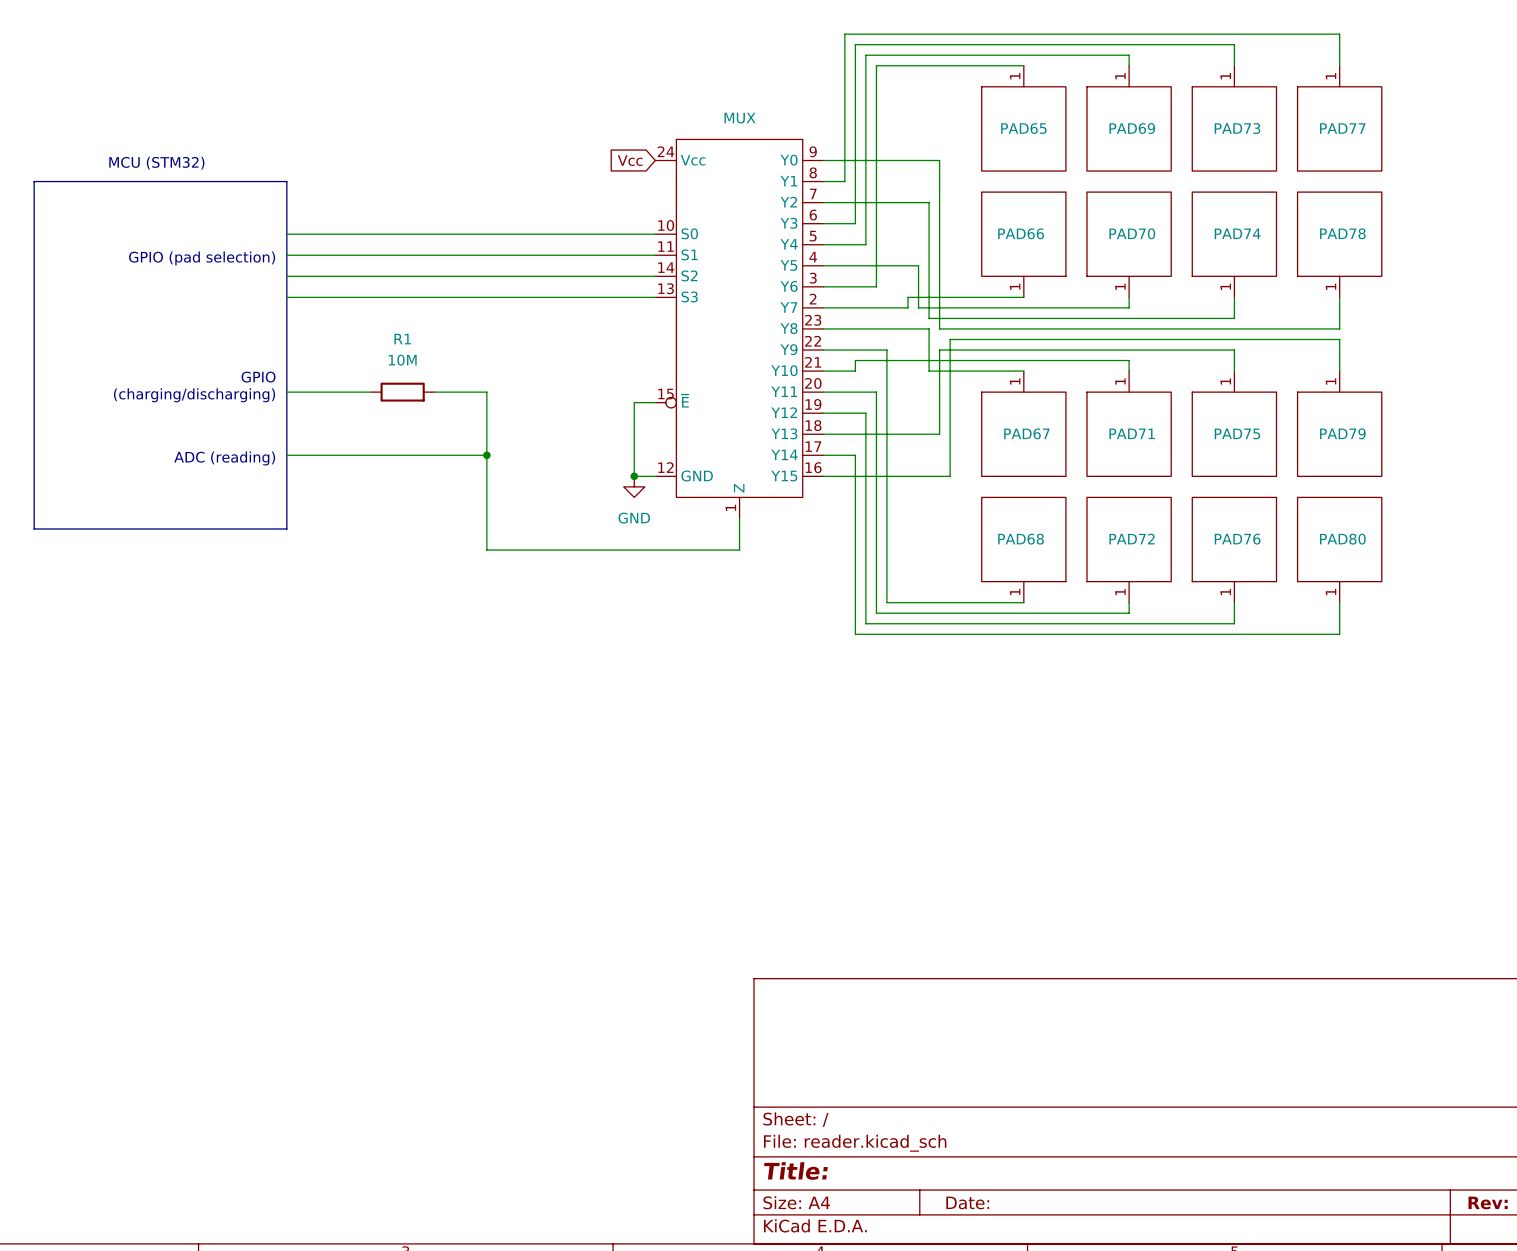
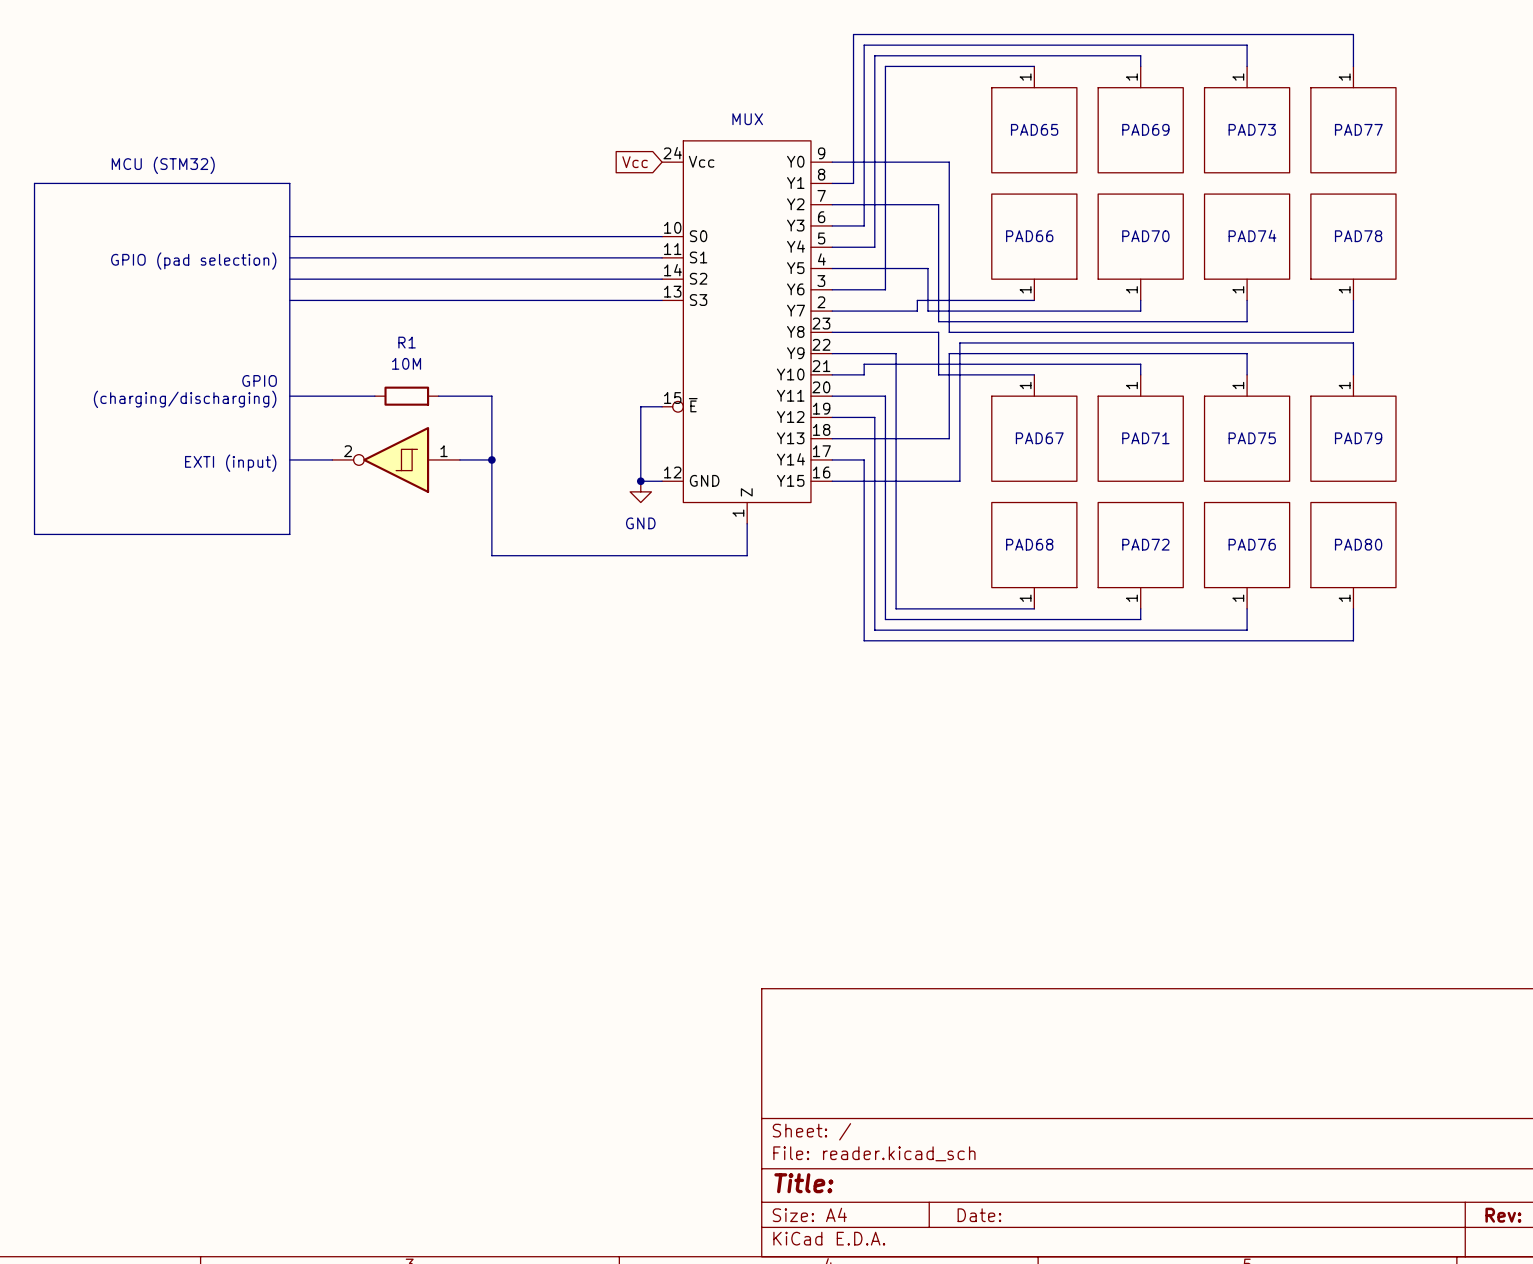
part: none -> (396, 459)
text: ADC (reading) (224, 458) -> EXTI (input) (230, 463)

